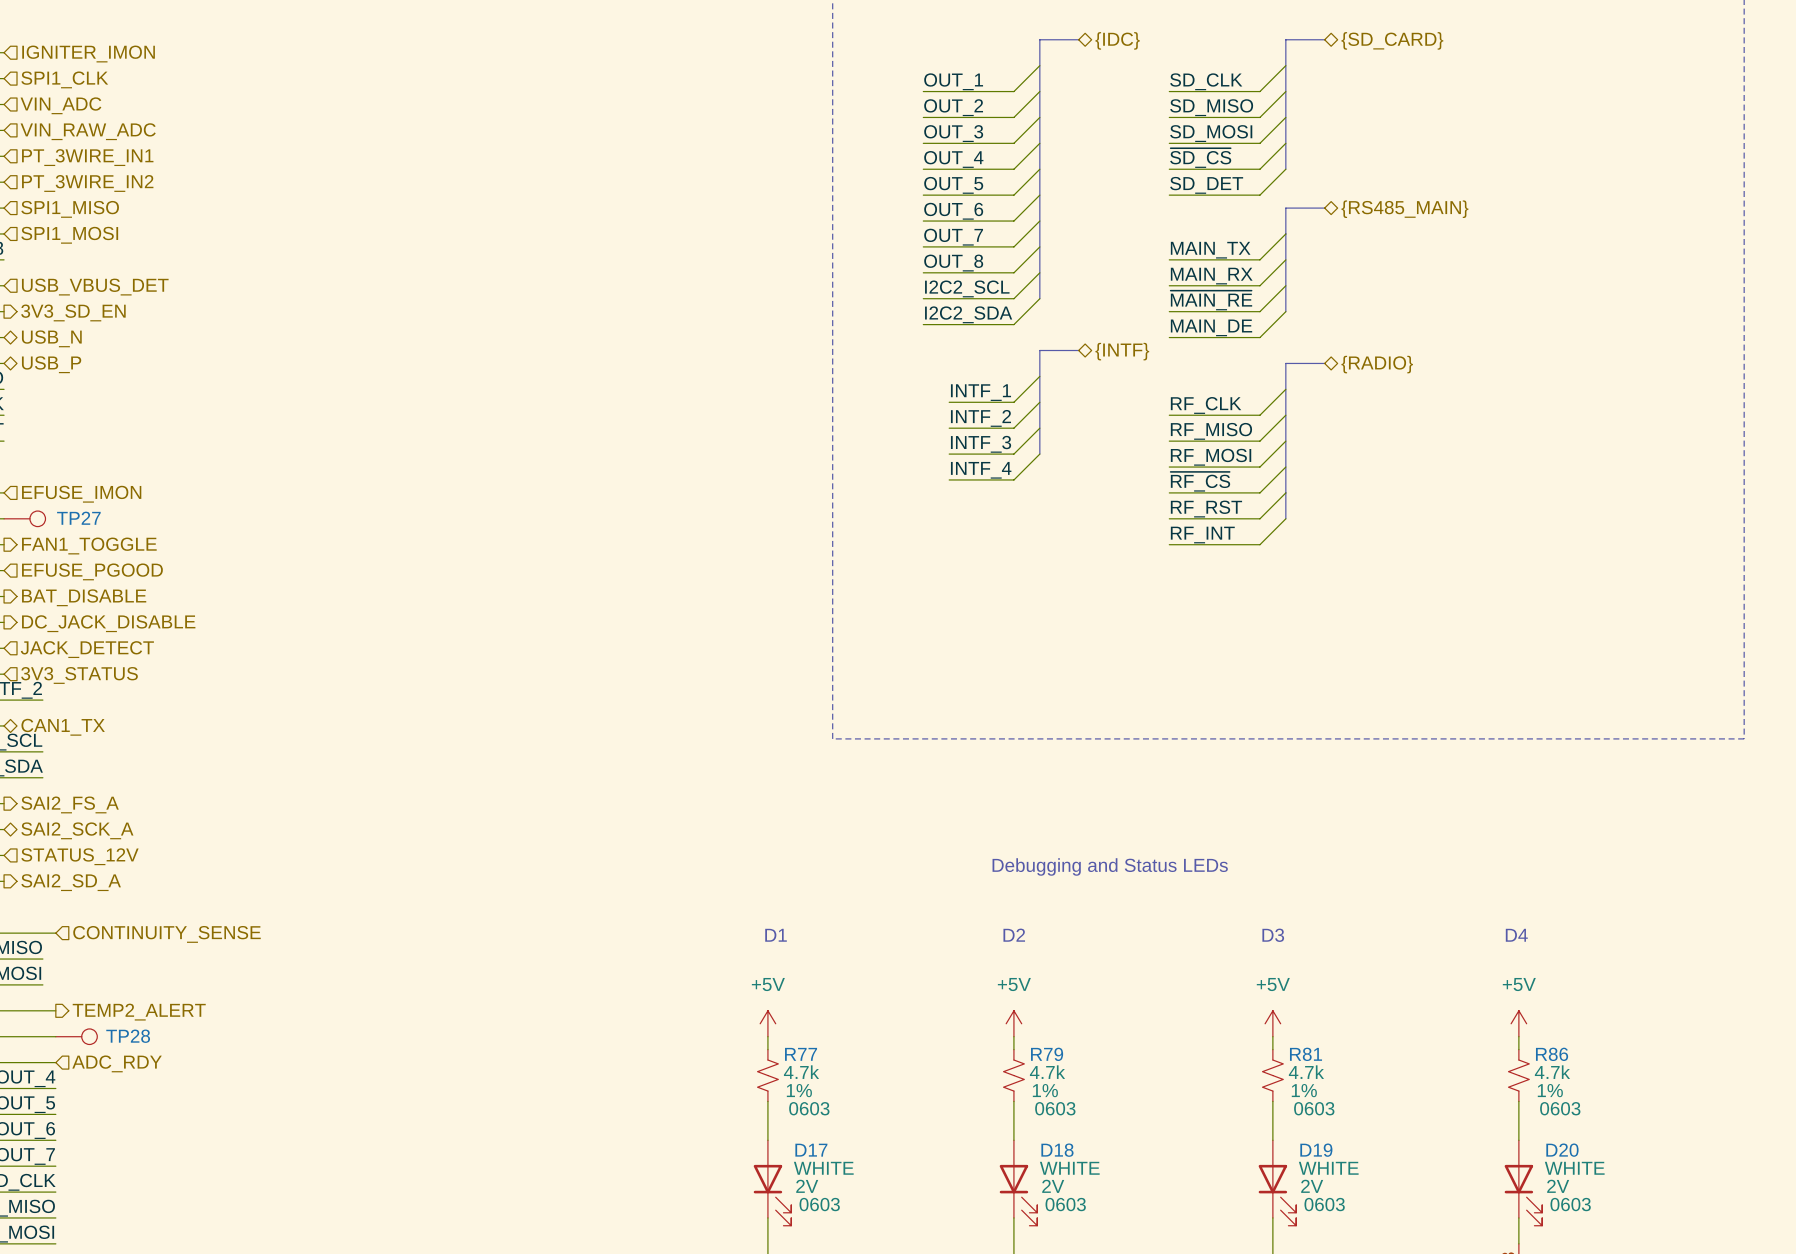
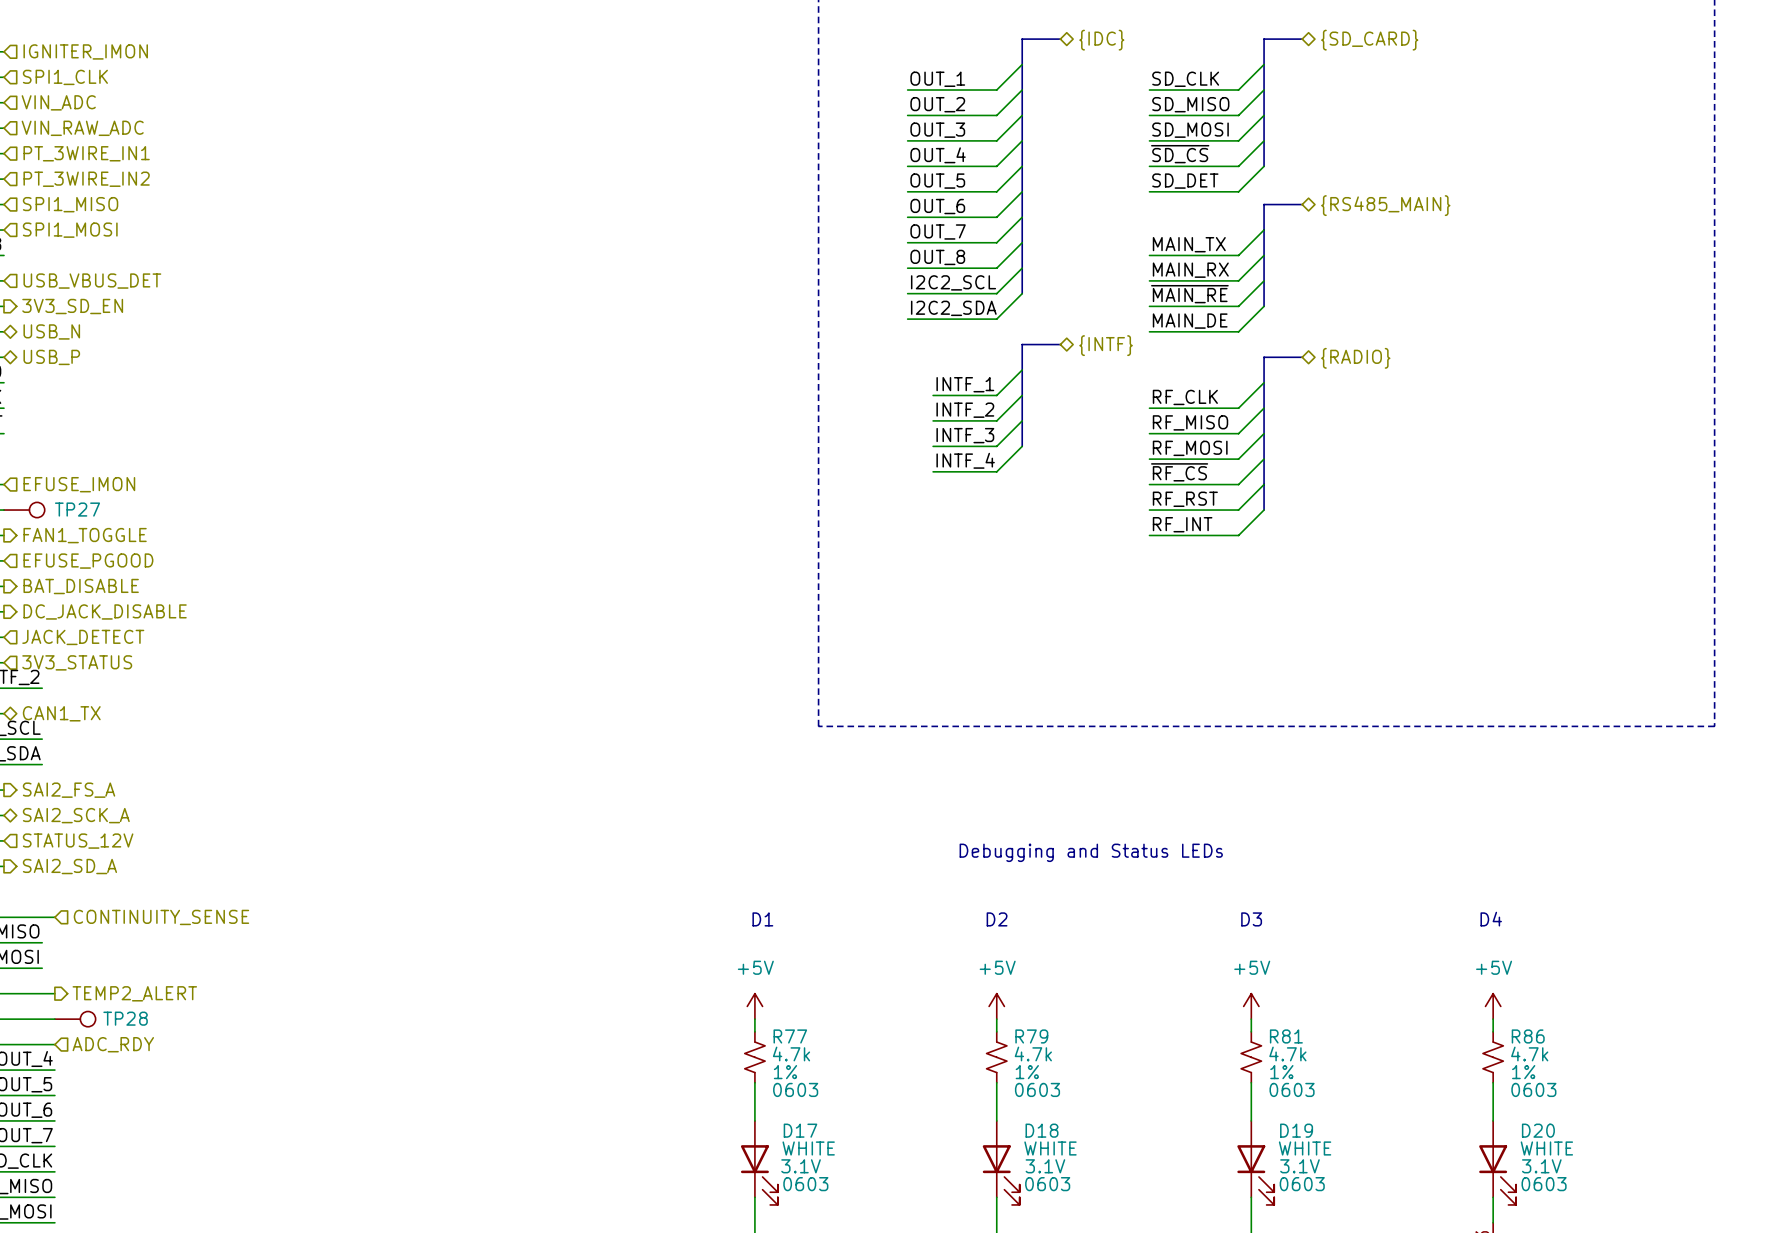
D17 text: 2V (807, 1186) -> 3.1V (801, 1166)
D18 text: 2V (1053, 1186) -> 3.1V (1045, 1166)
D19 text: 2V (1312, 1186) -> 3.1V (1299, 1166)
D20 text: 2V (1558, 1186) -> 3.1V (1541, 1166)

